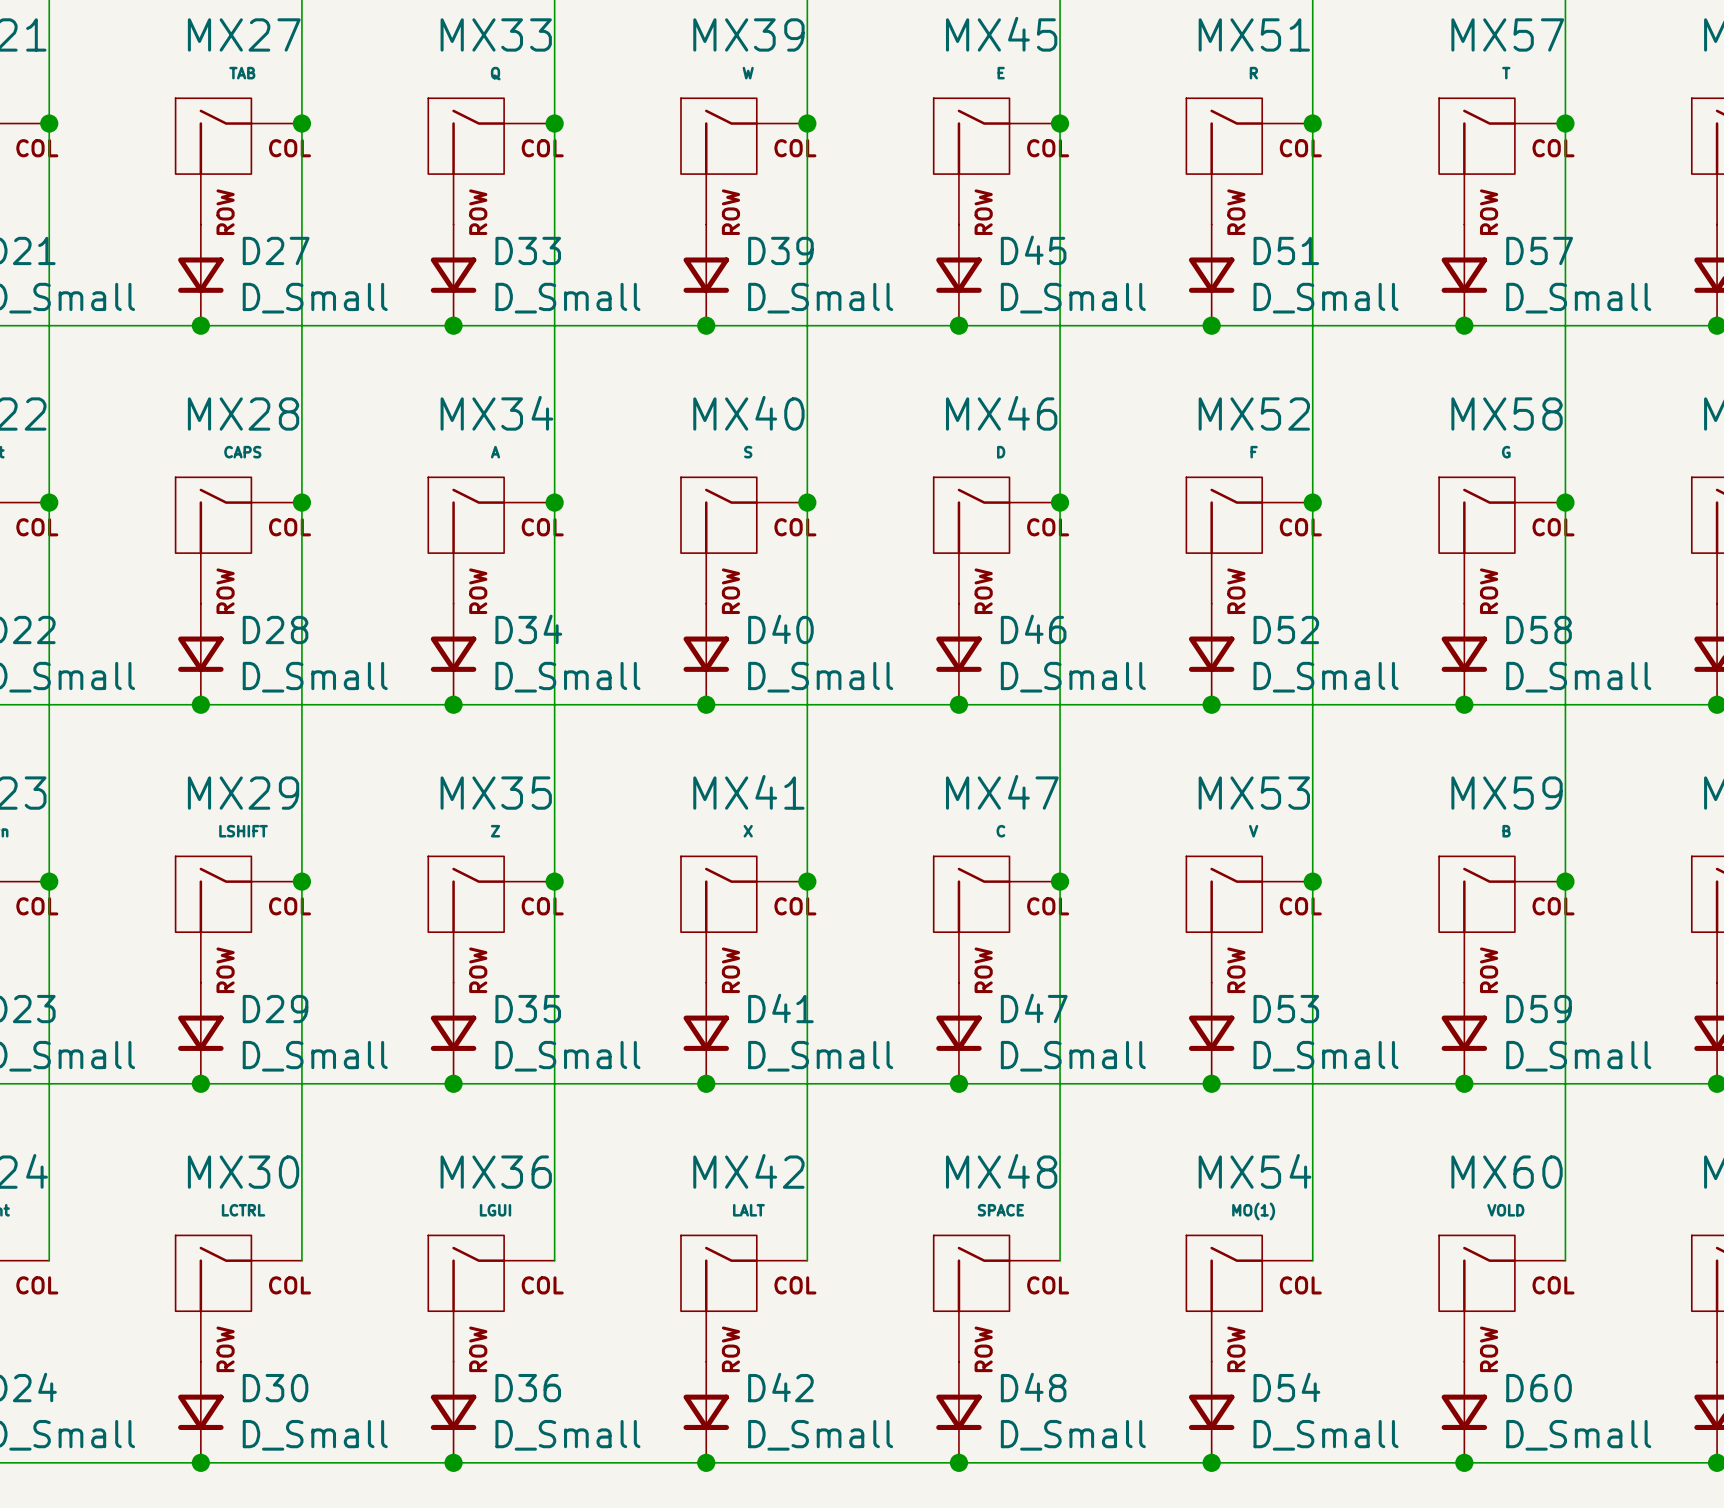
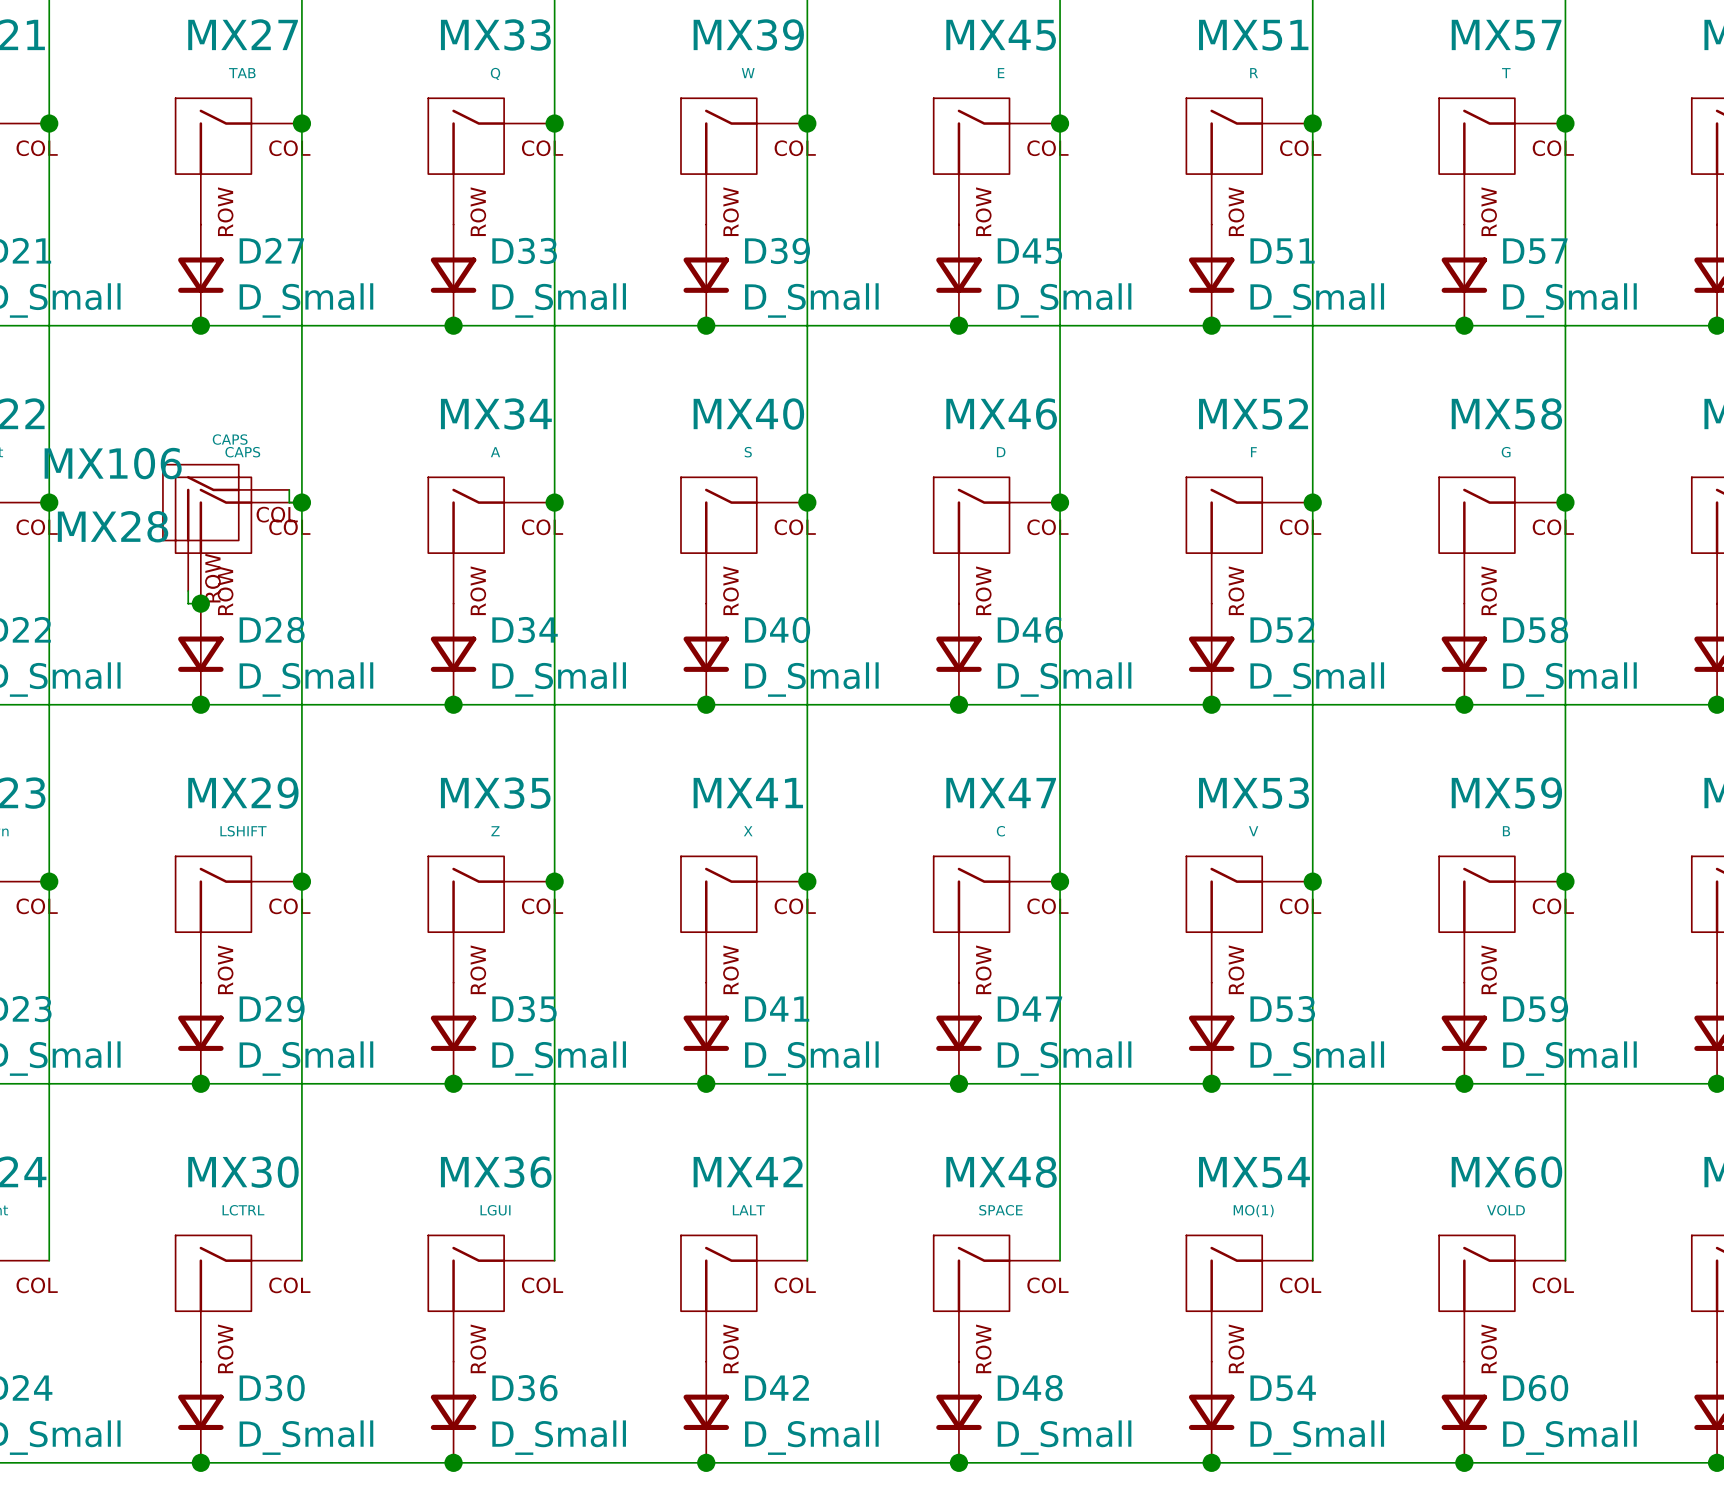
MX28 name position: MX28 (243, 414) -> MX28 (113, 526)
wire: none -> (289, 489) (289, 502) (301, 502)
MX106: none -> CAPS (226, 527)
wire: none -> (188, 591) (188, 603) (200, 603)
junction: none -> (200, 603)

